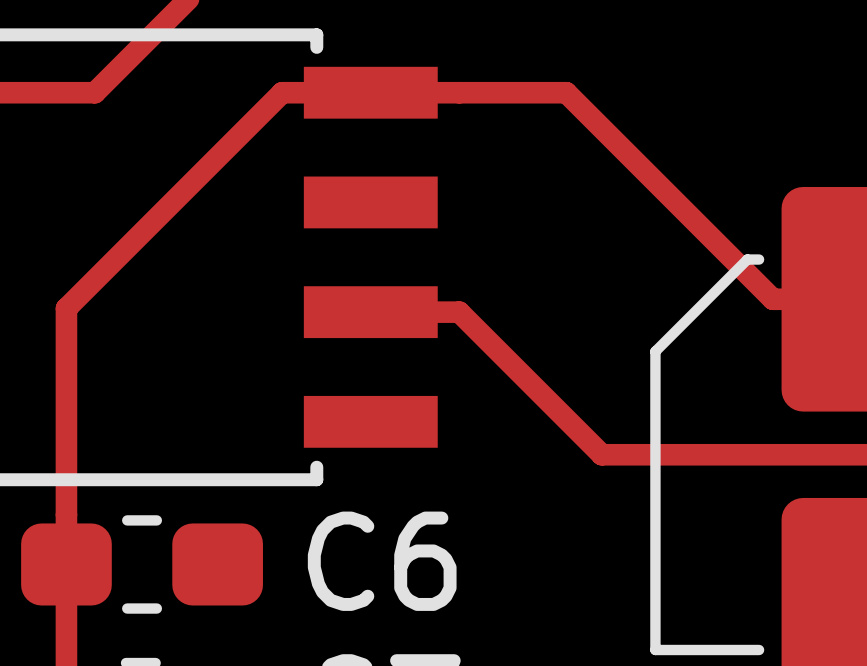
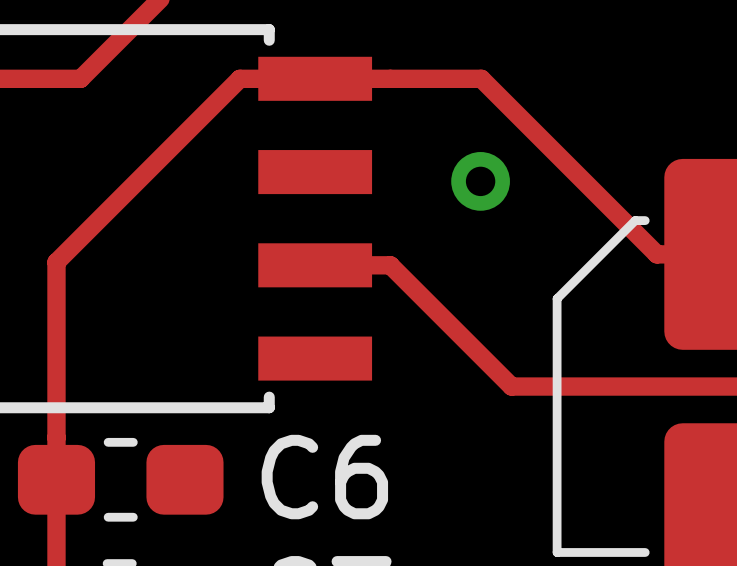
via: none -> (480, 181)

